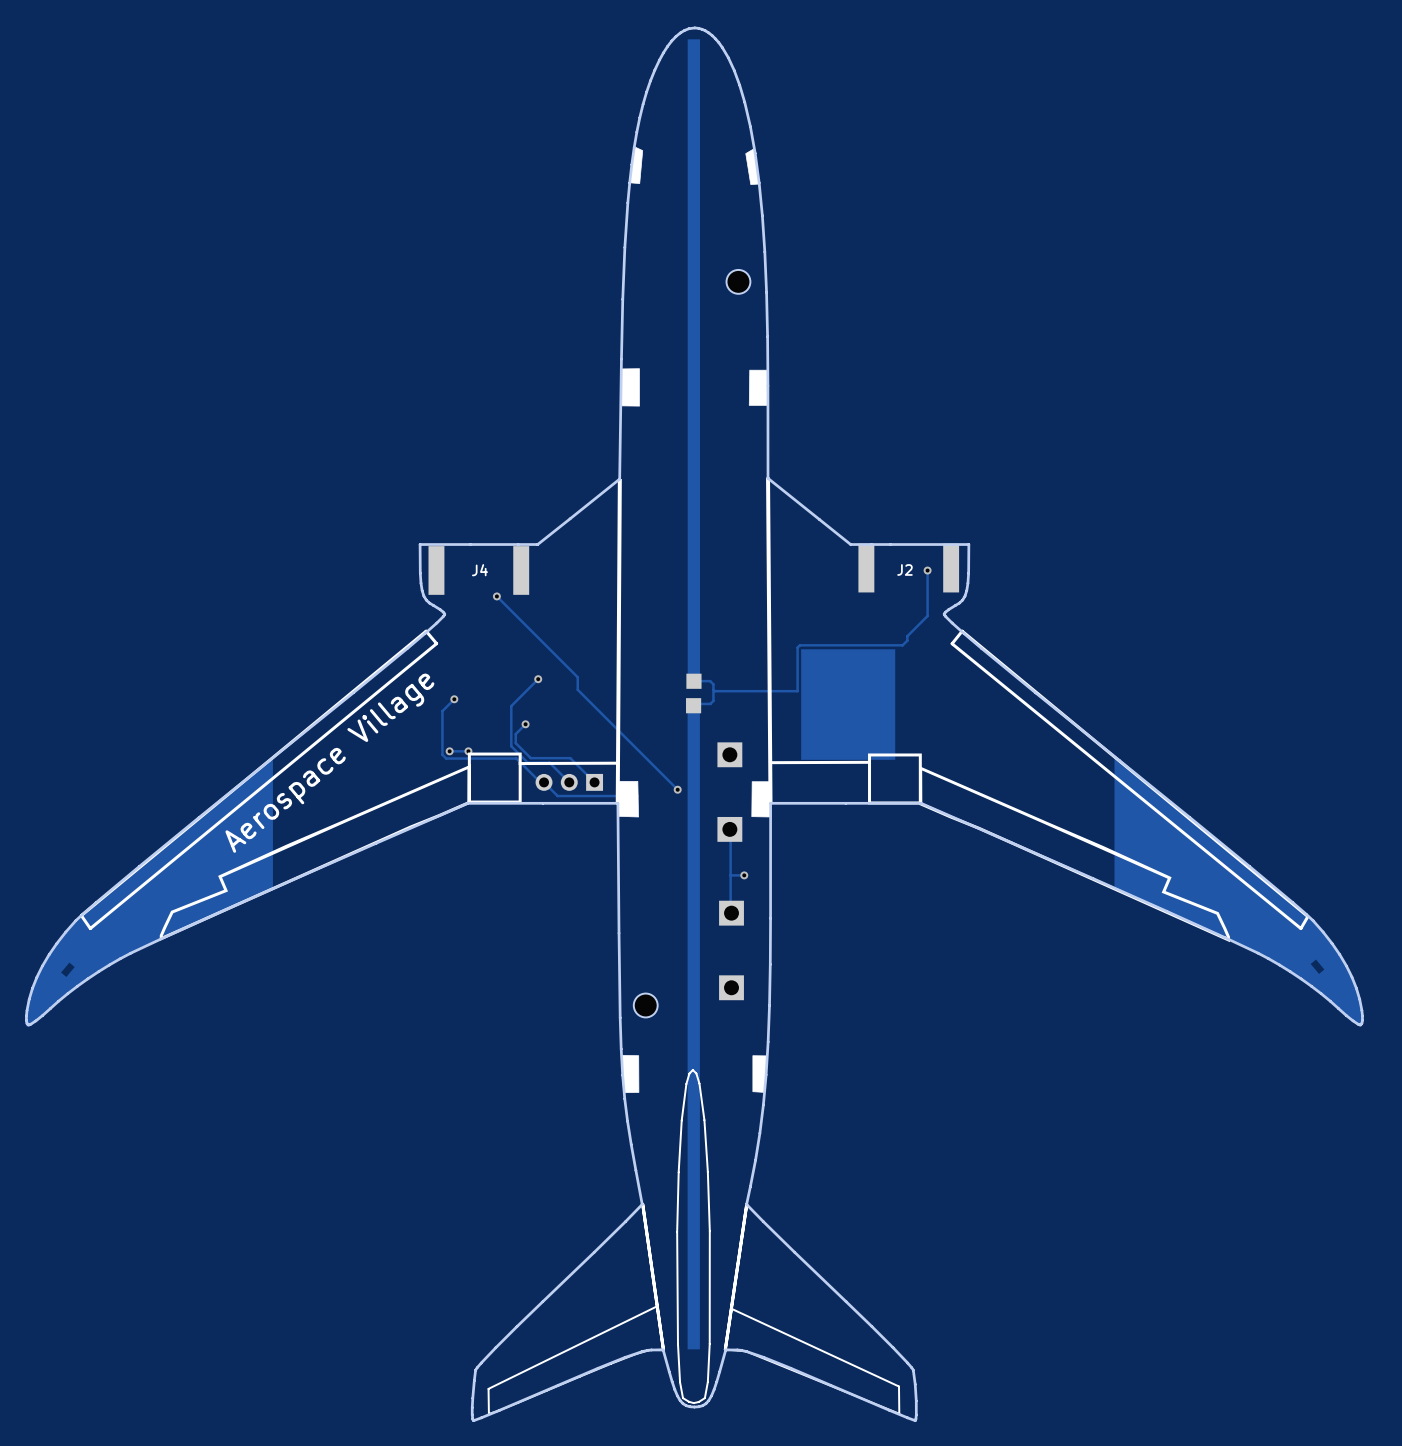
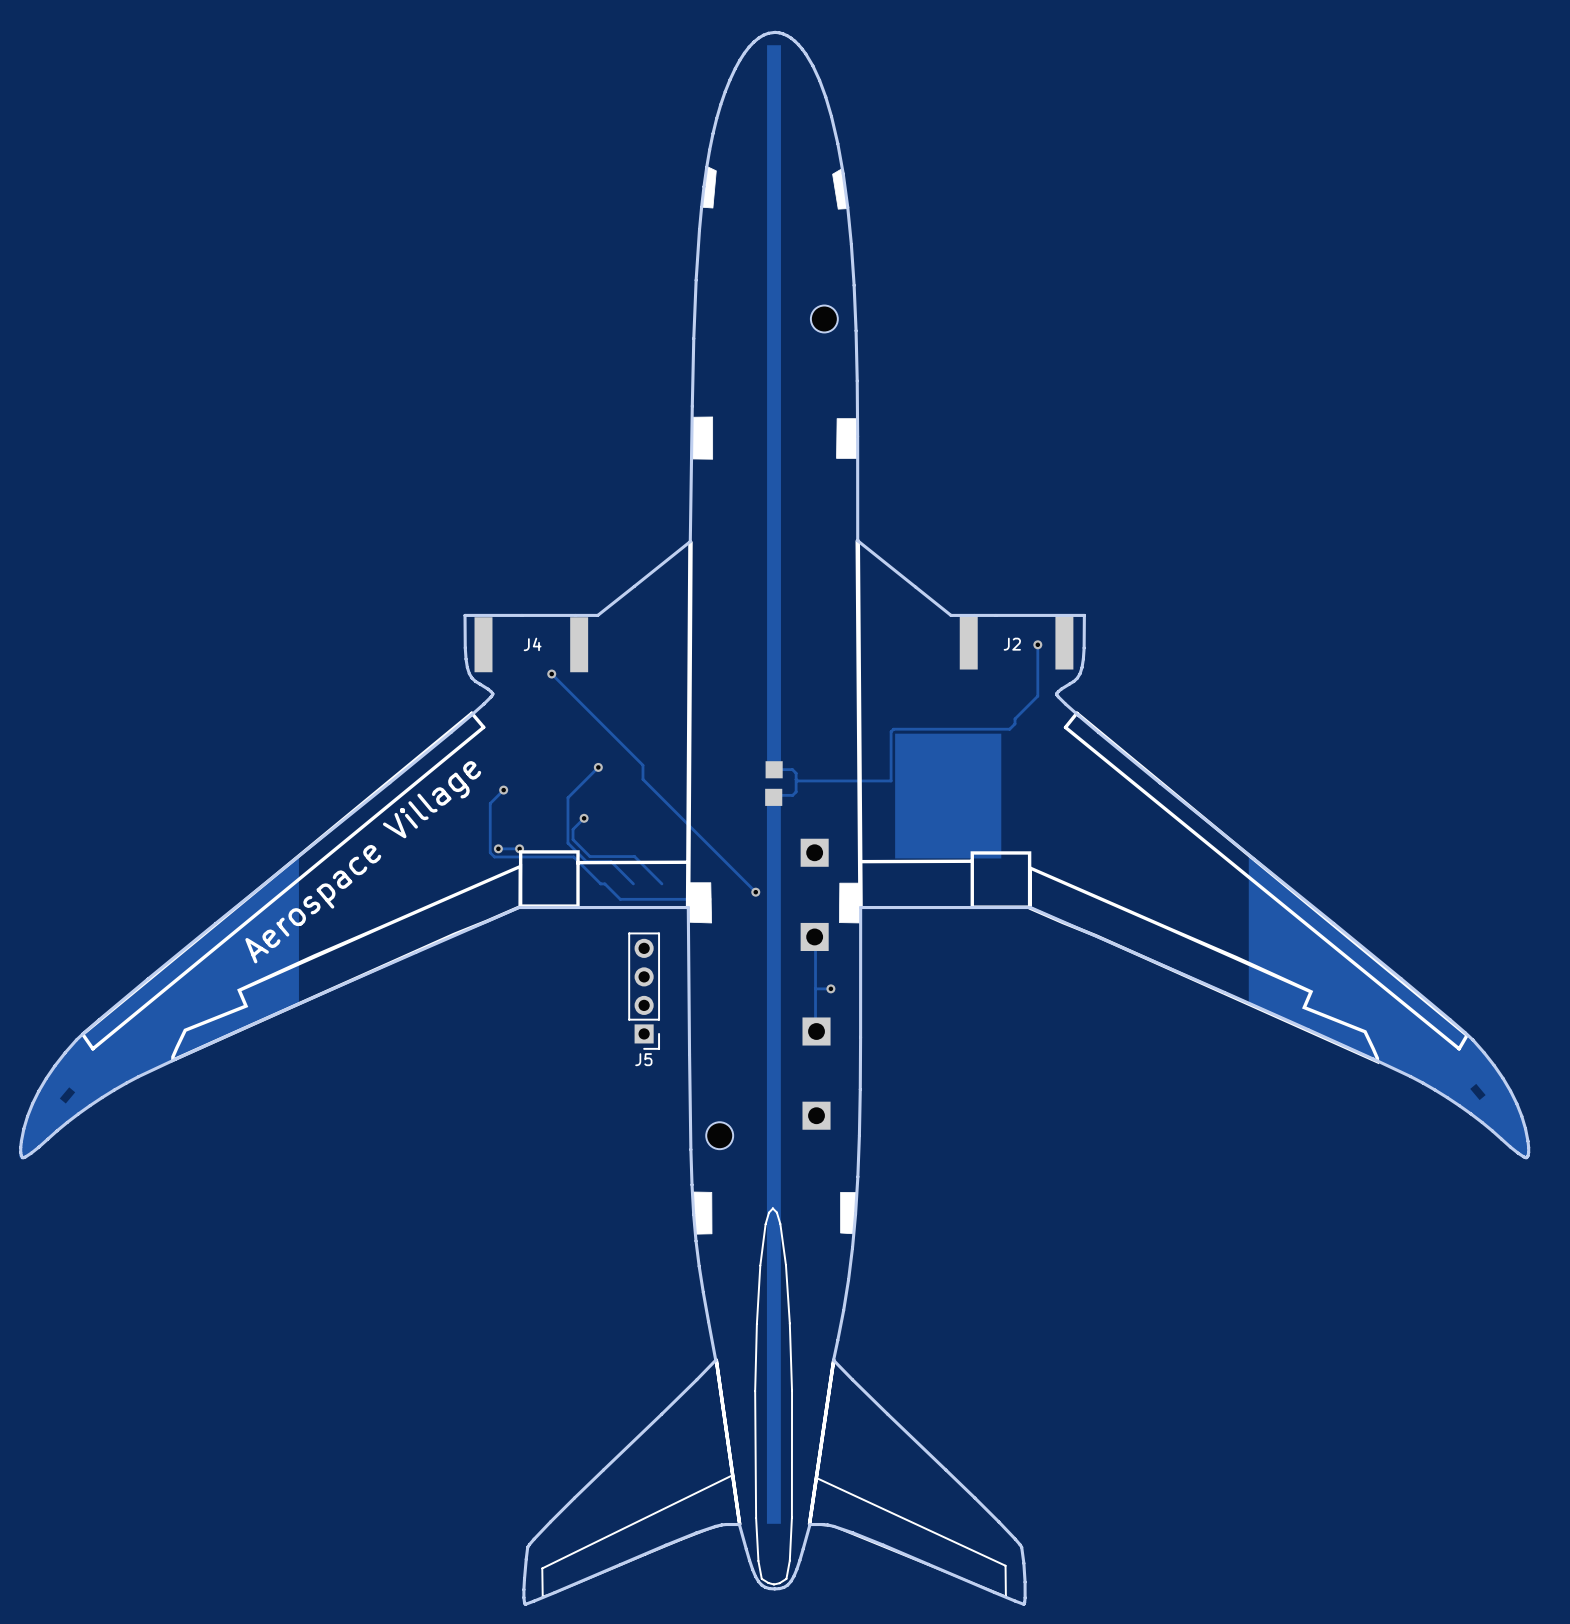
part: (569, 782) -> none
J5: none -> (644, 991)

